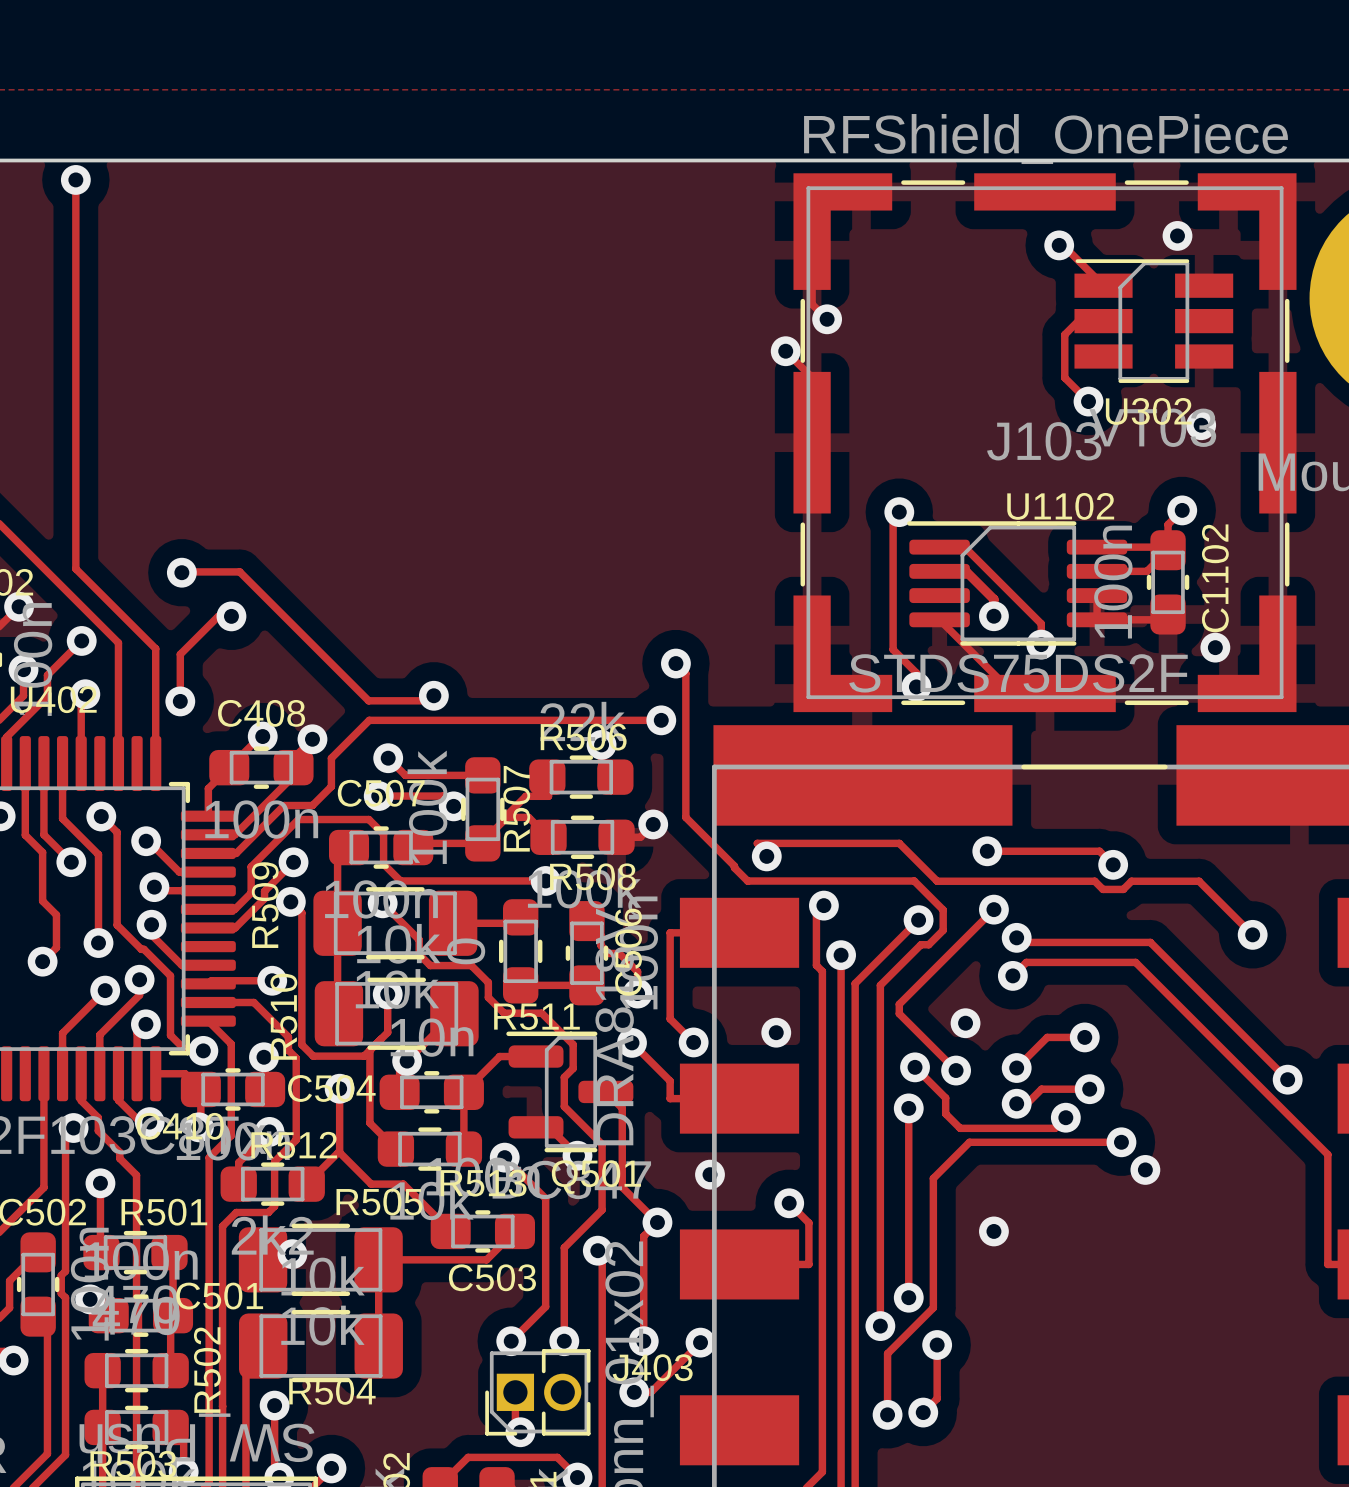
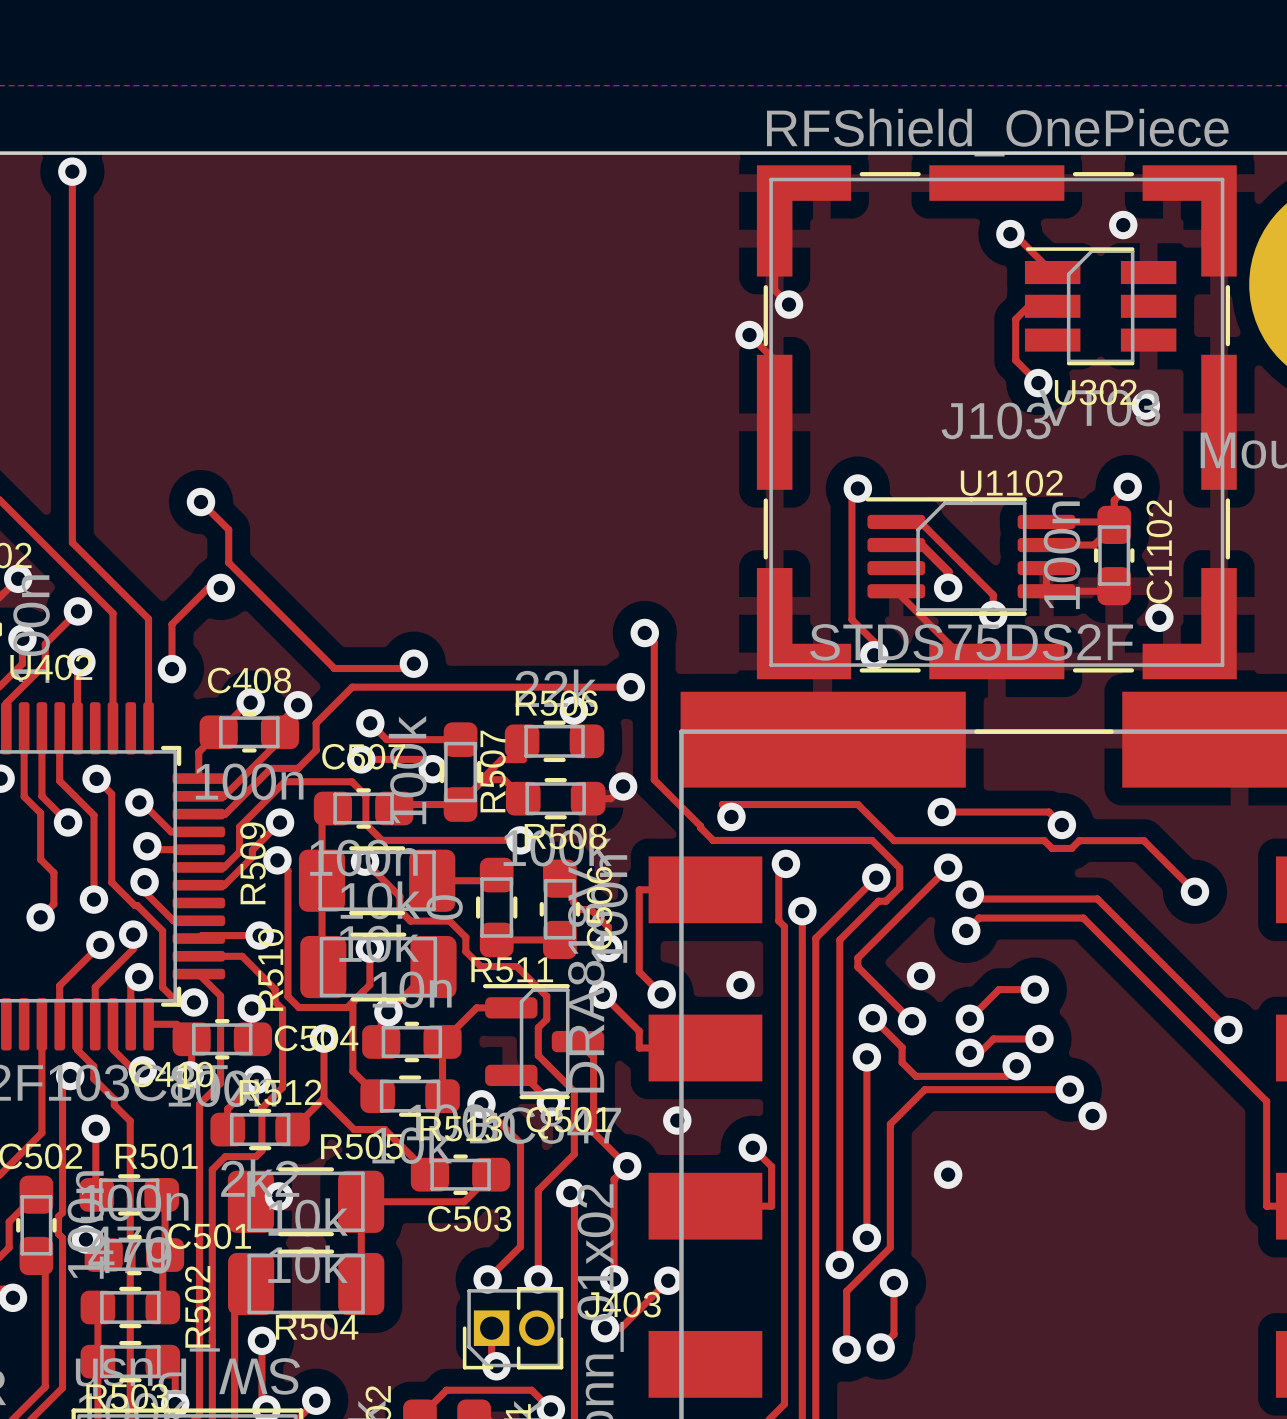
track: (181, 572) (239, 571) (368, 700) -> (200, 502) (228, 529) (228, 562) (334, 668) (351, 668)
via position: (181, 572) -> (200, 502)

